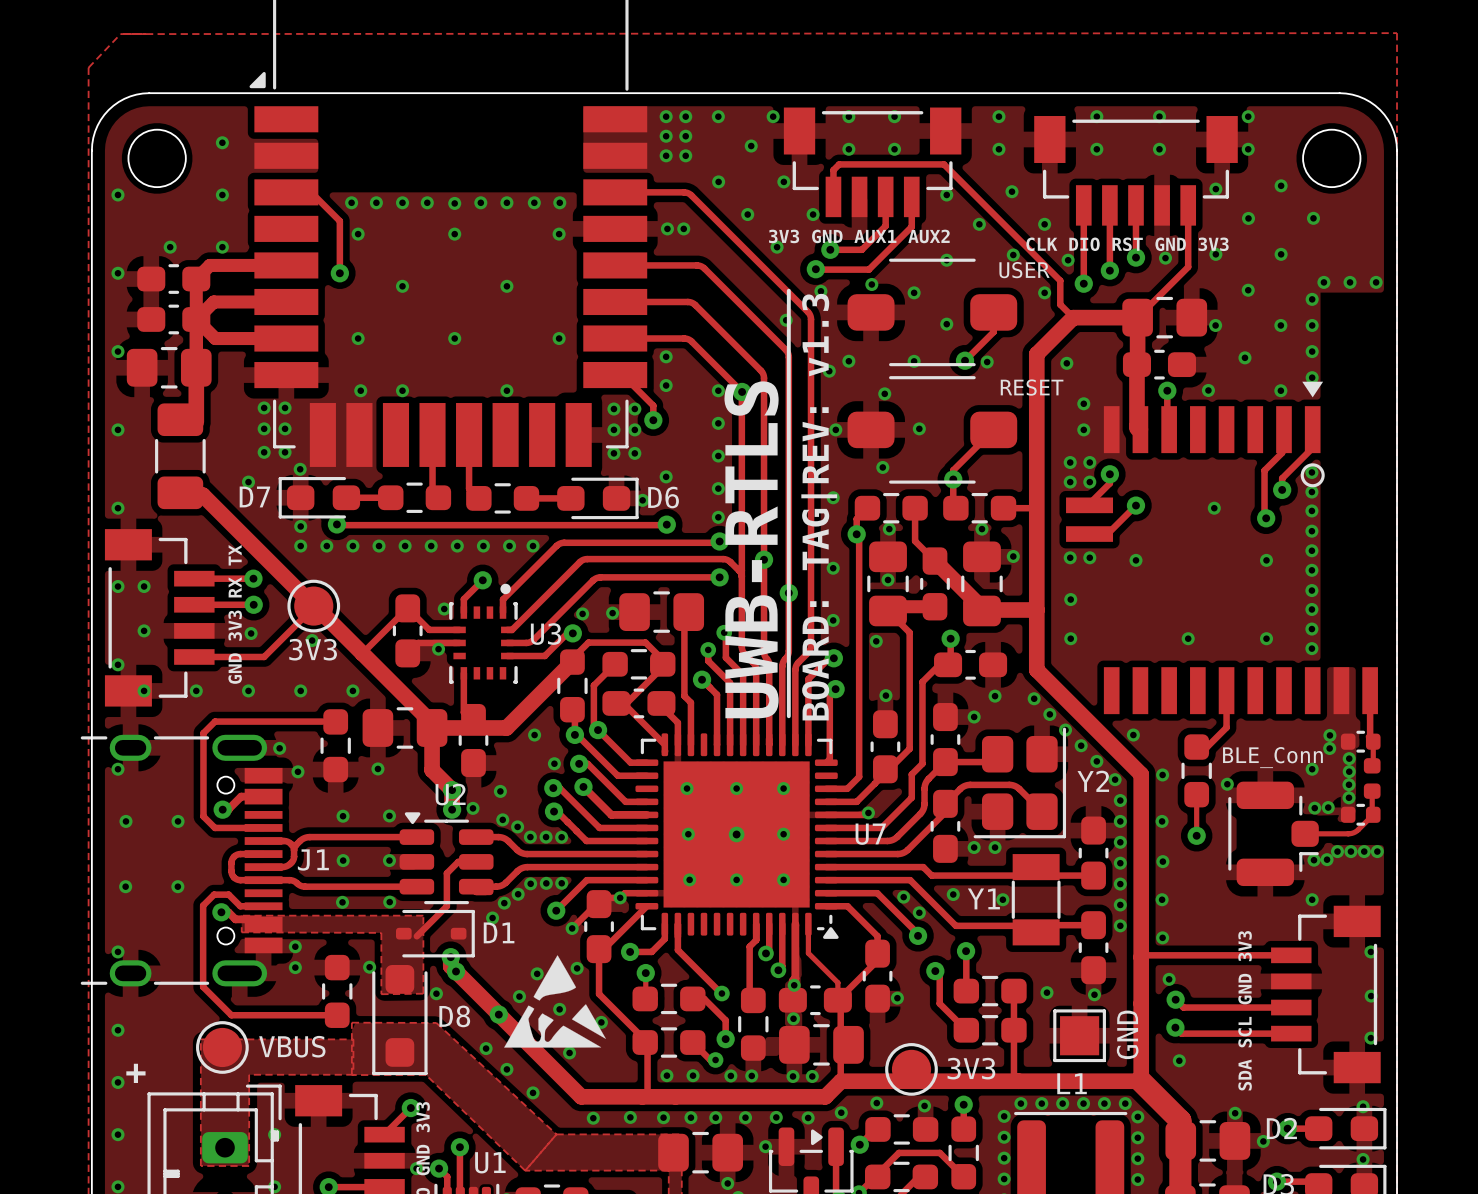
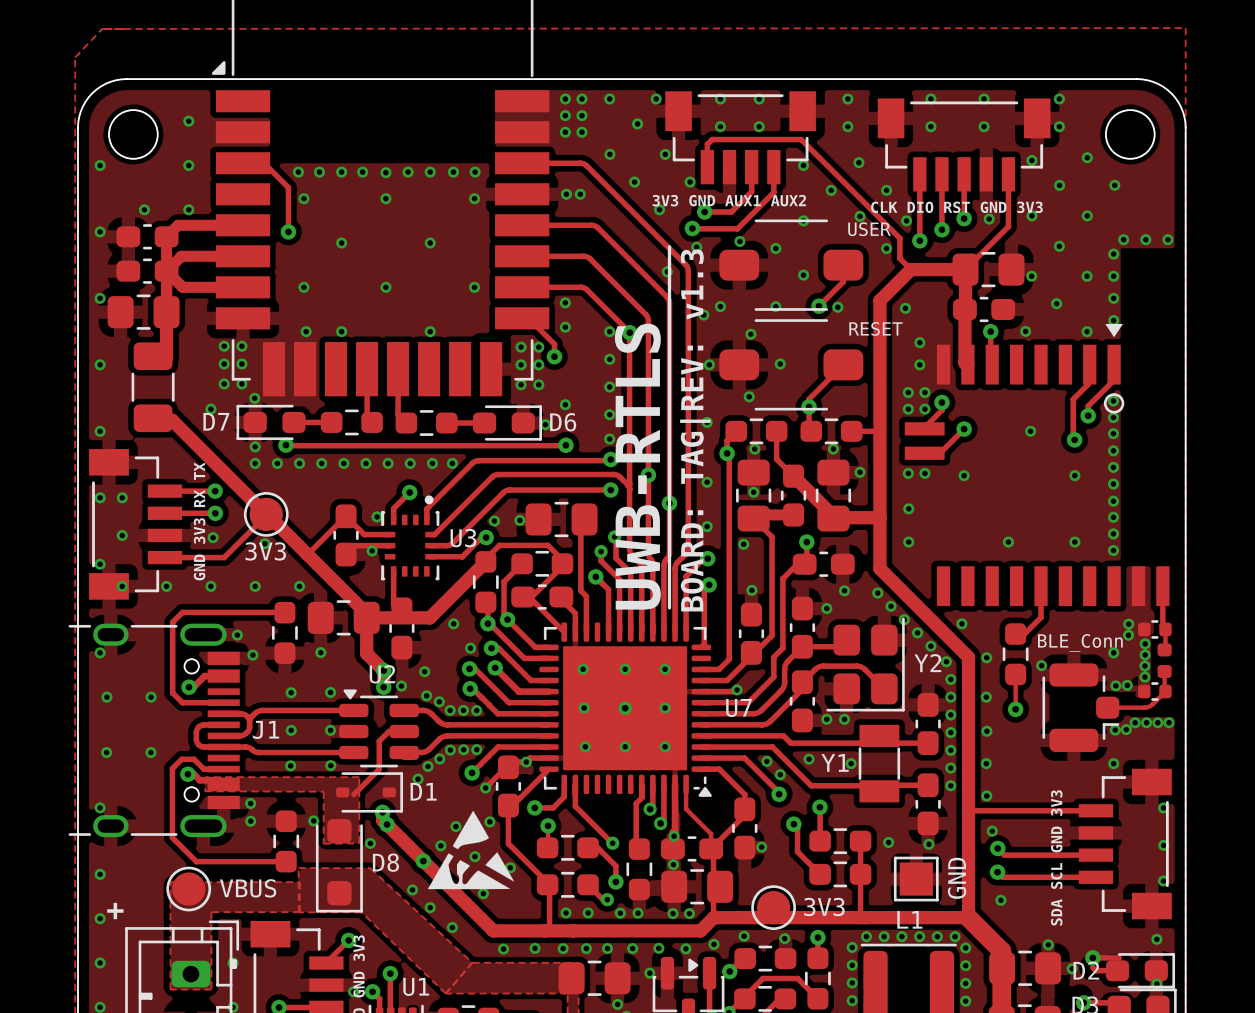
D2 position: (1345, 1128) -> (1140, 970)
track: none -> (1092, 967) (1095, 970) (1119, 970)

